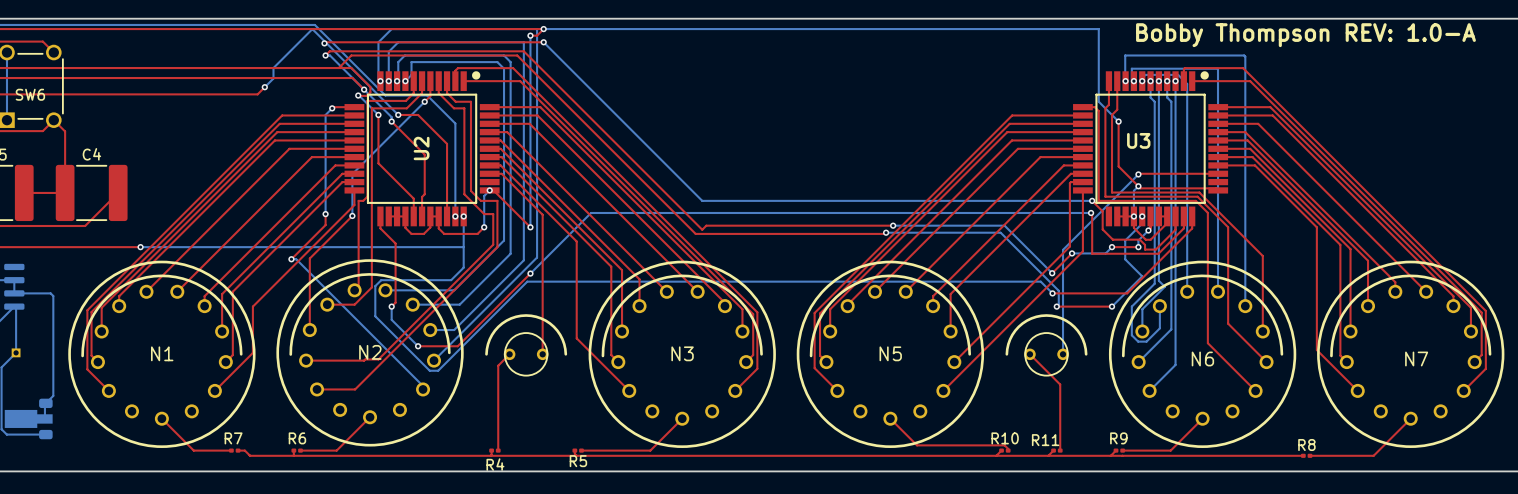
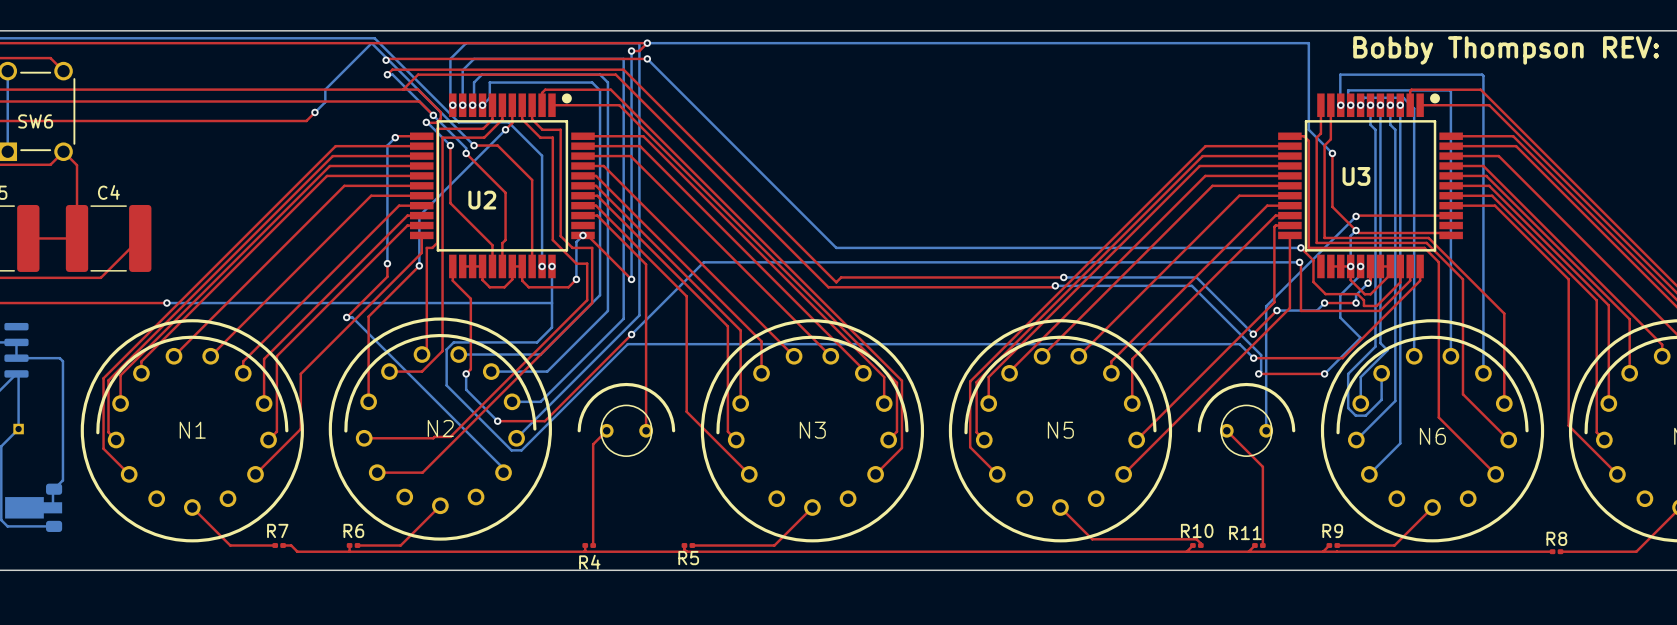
U2 name rotation: 0° (421, 148) -> 90° clockwise (482, 200)

